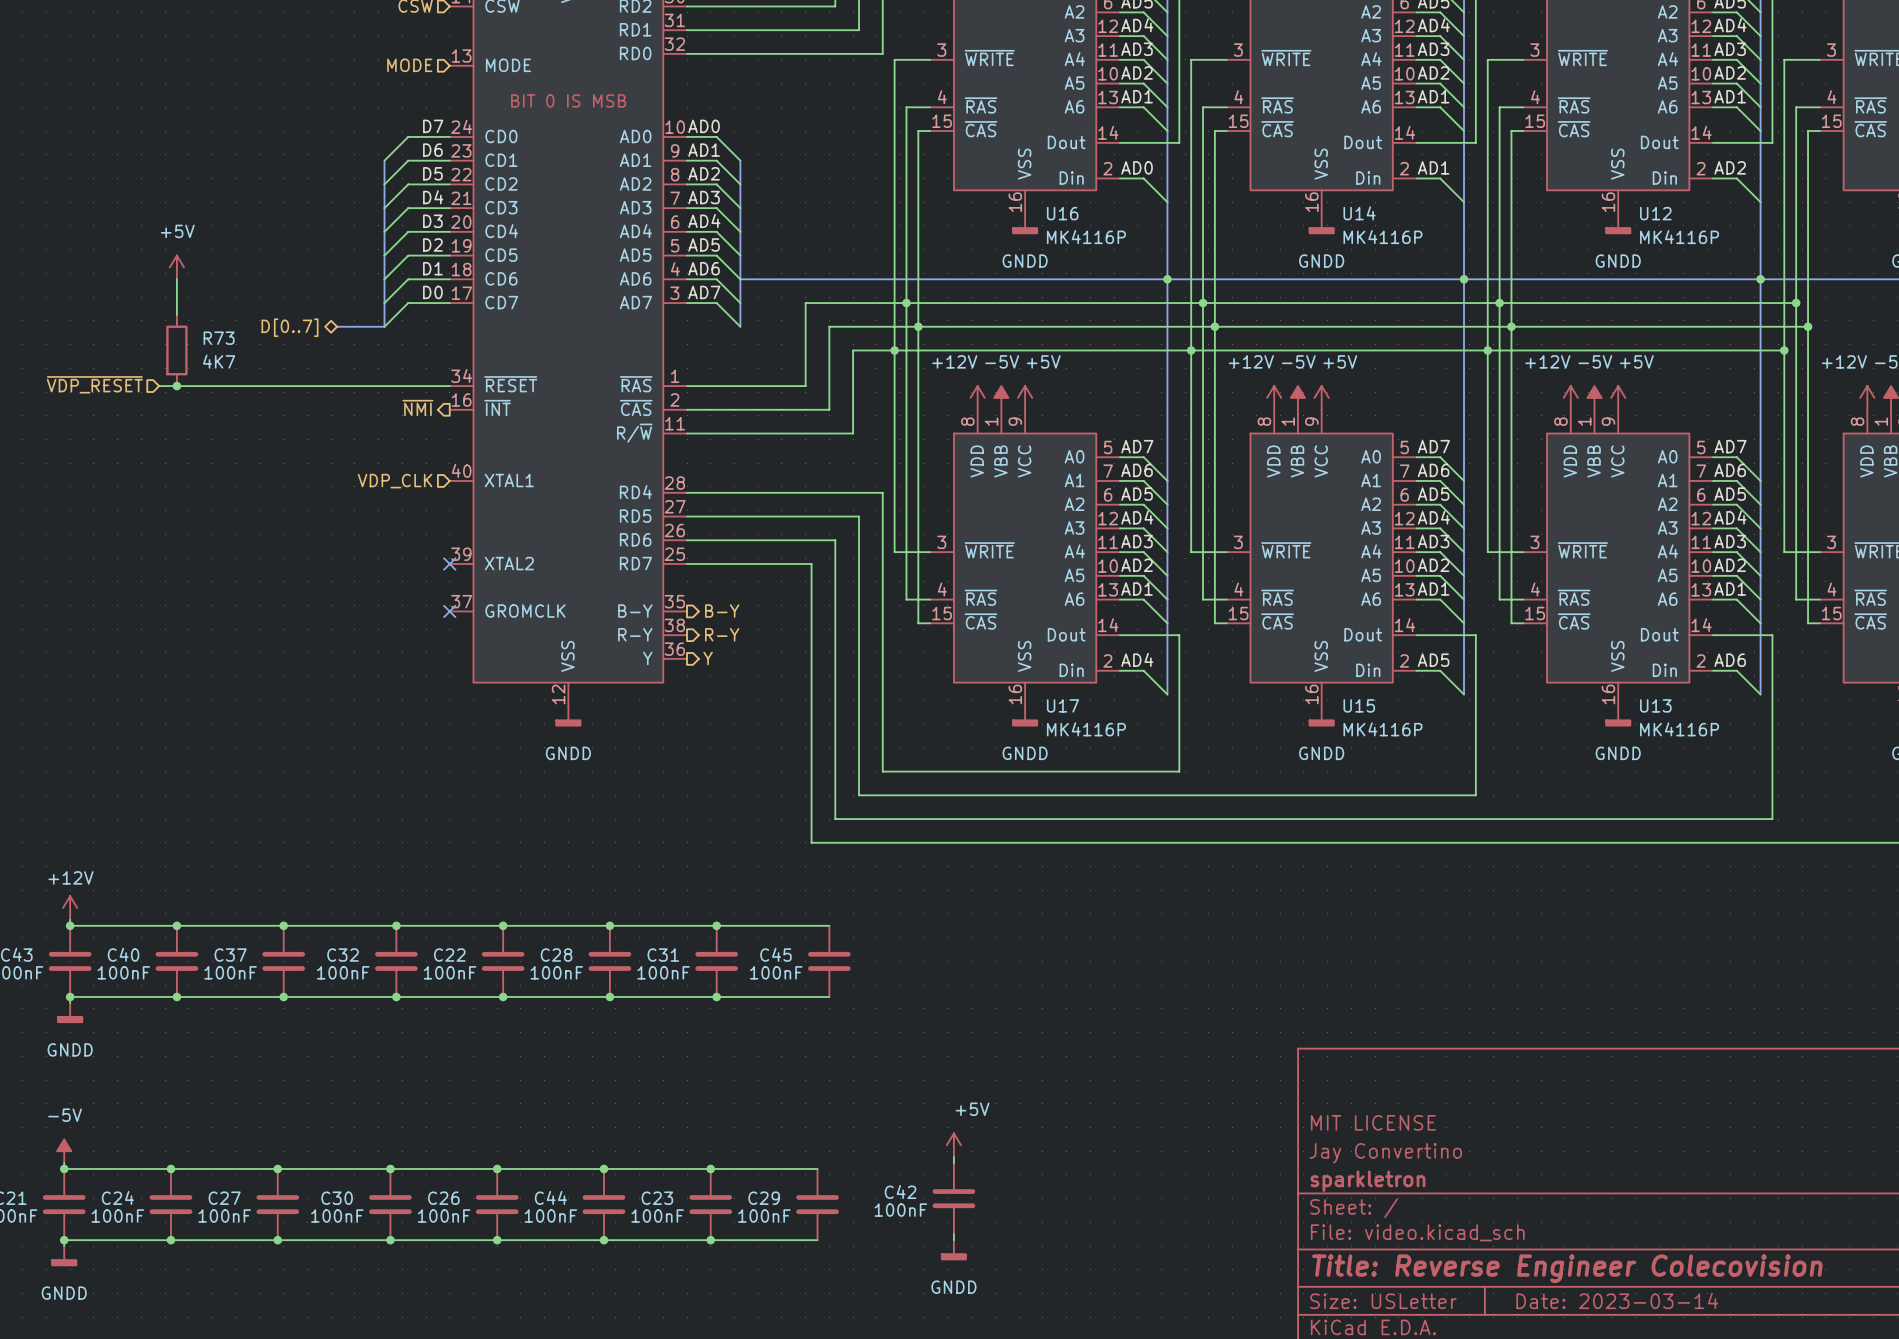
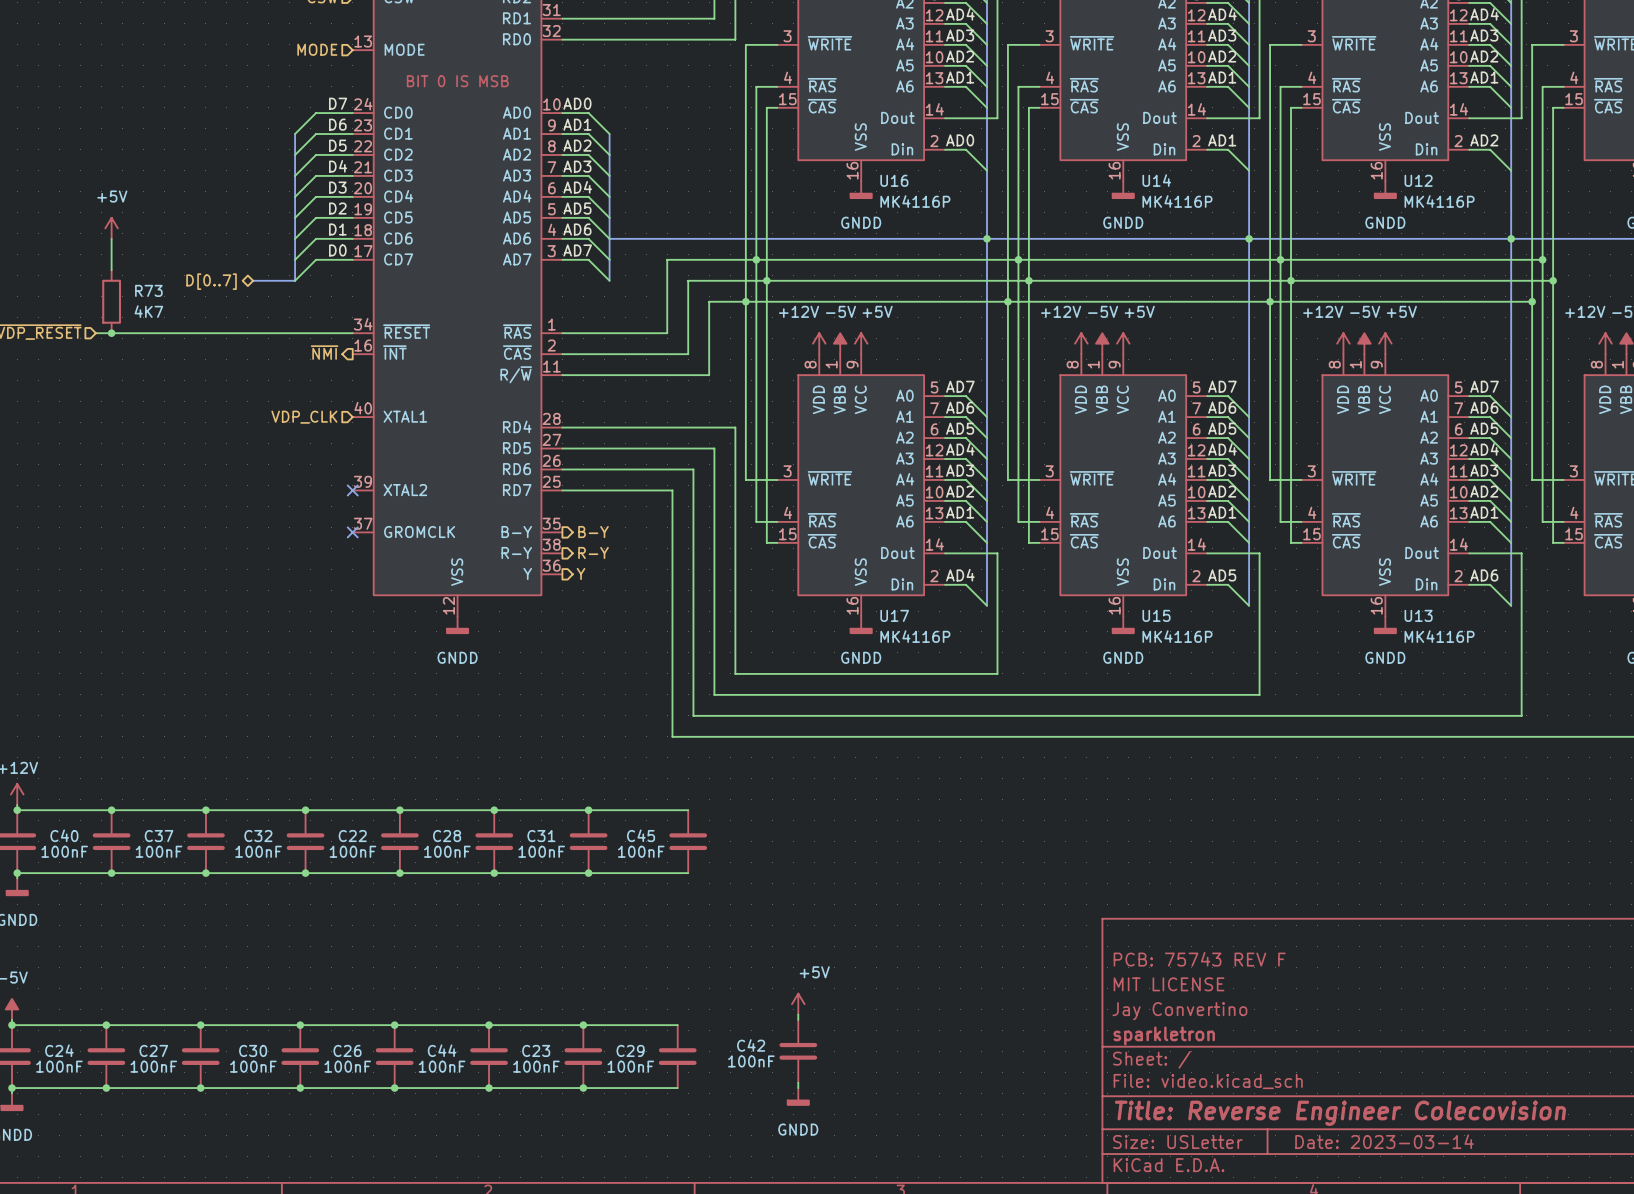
title block: none -> PCB: 75743 REV F (1199, 959)

